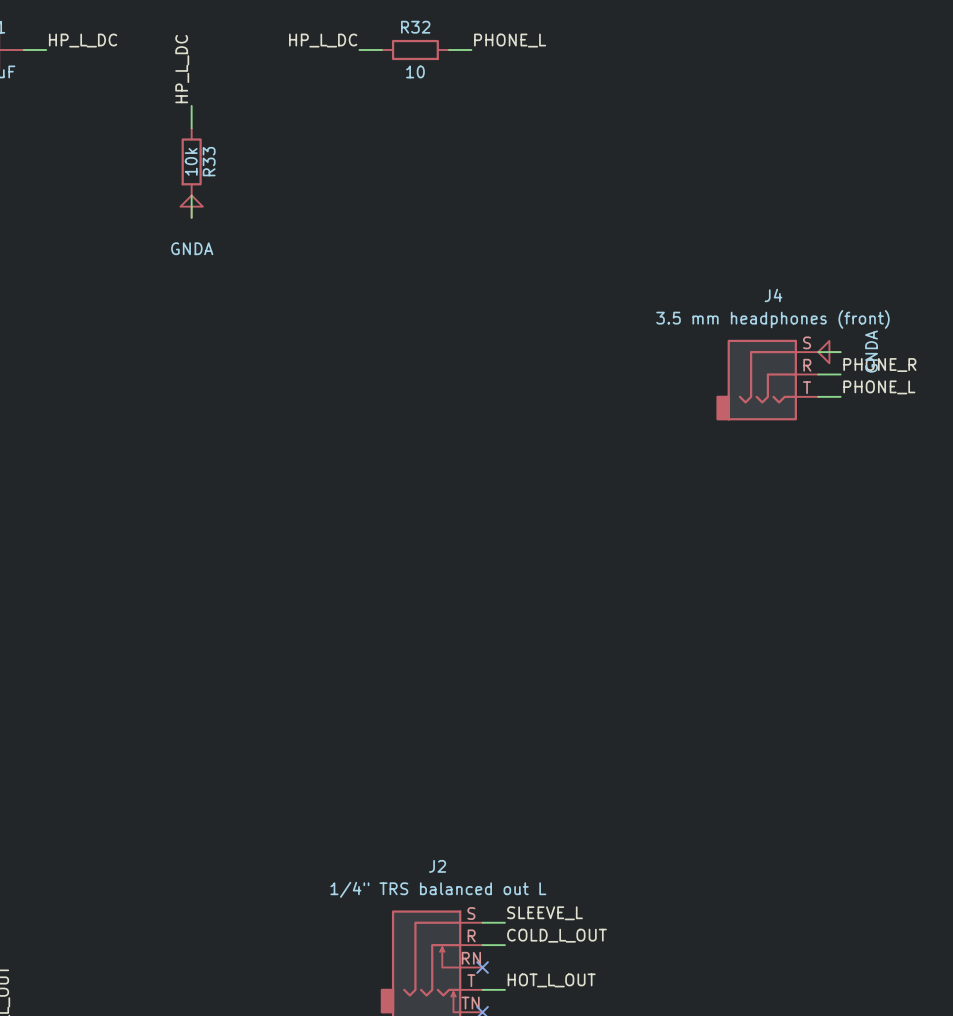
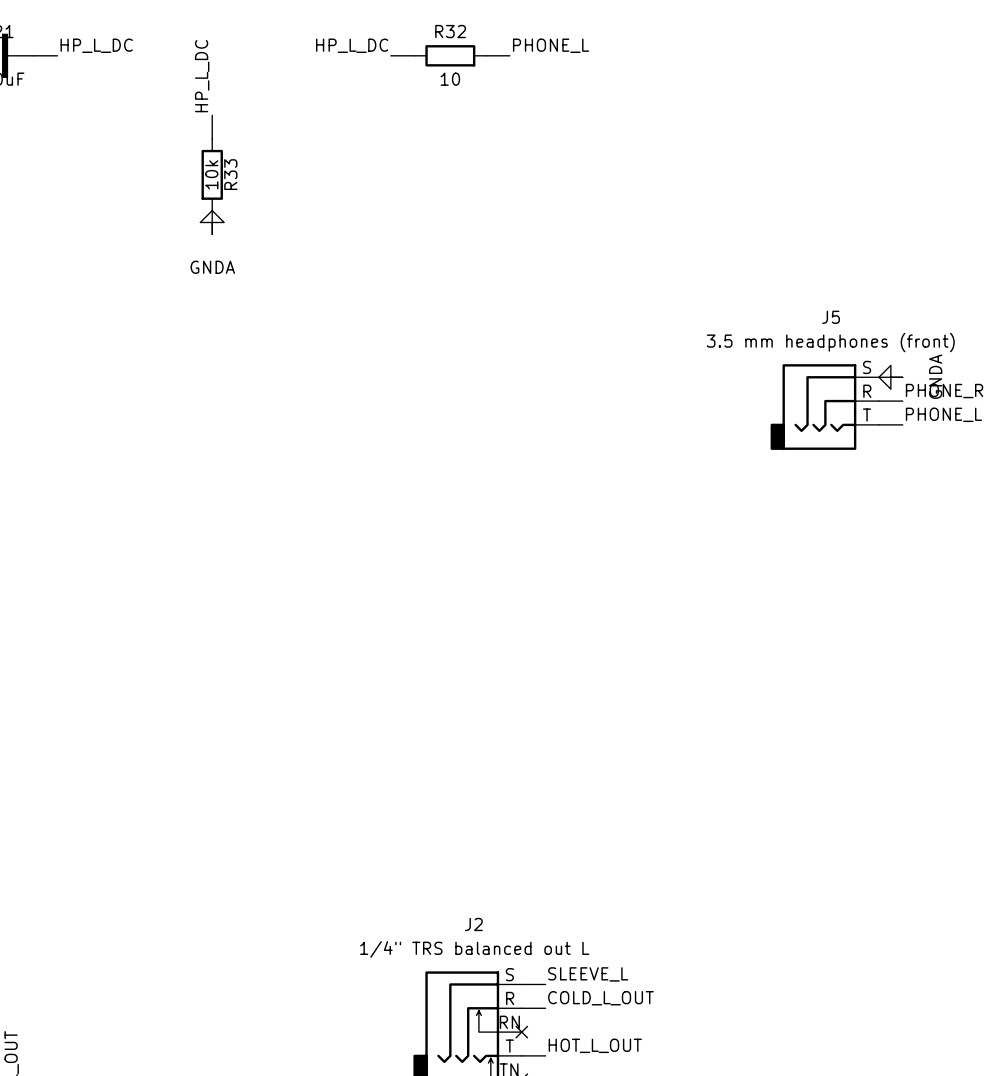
J4 name: J4 (773, 295) -> J5 (831, 317)

